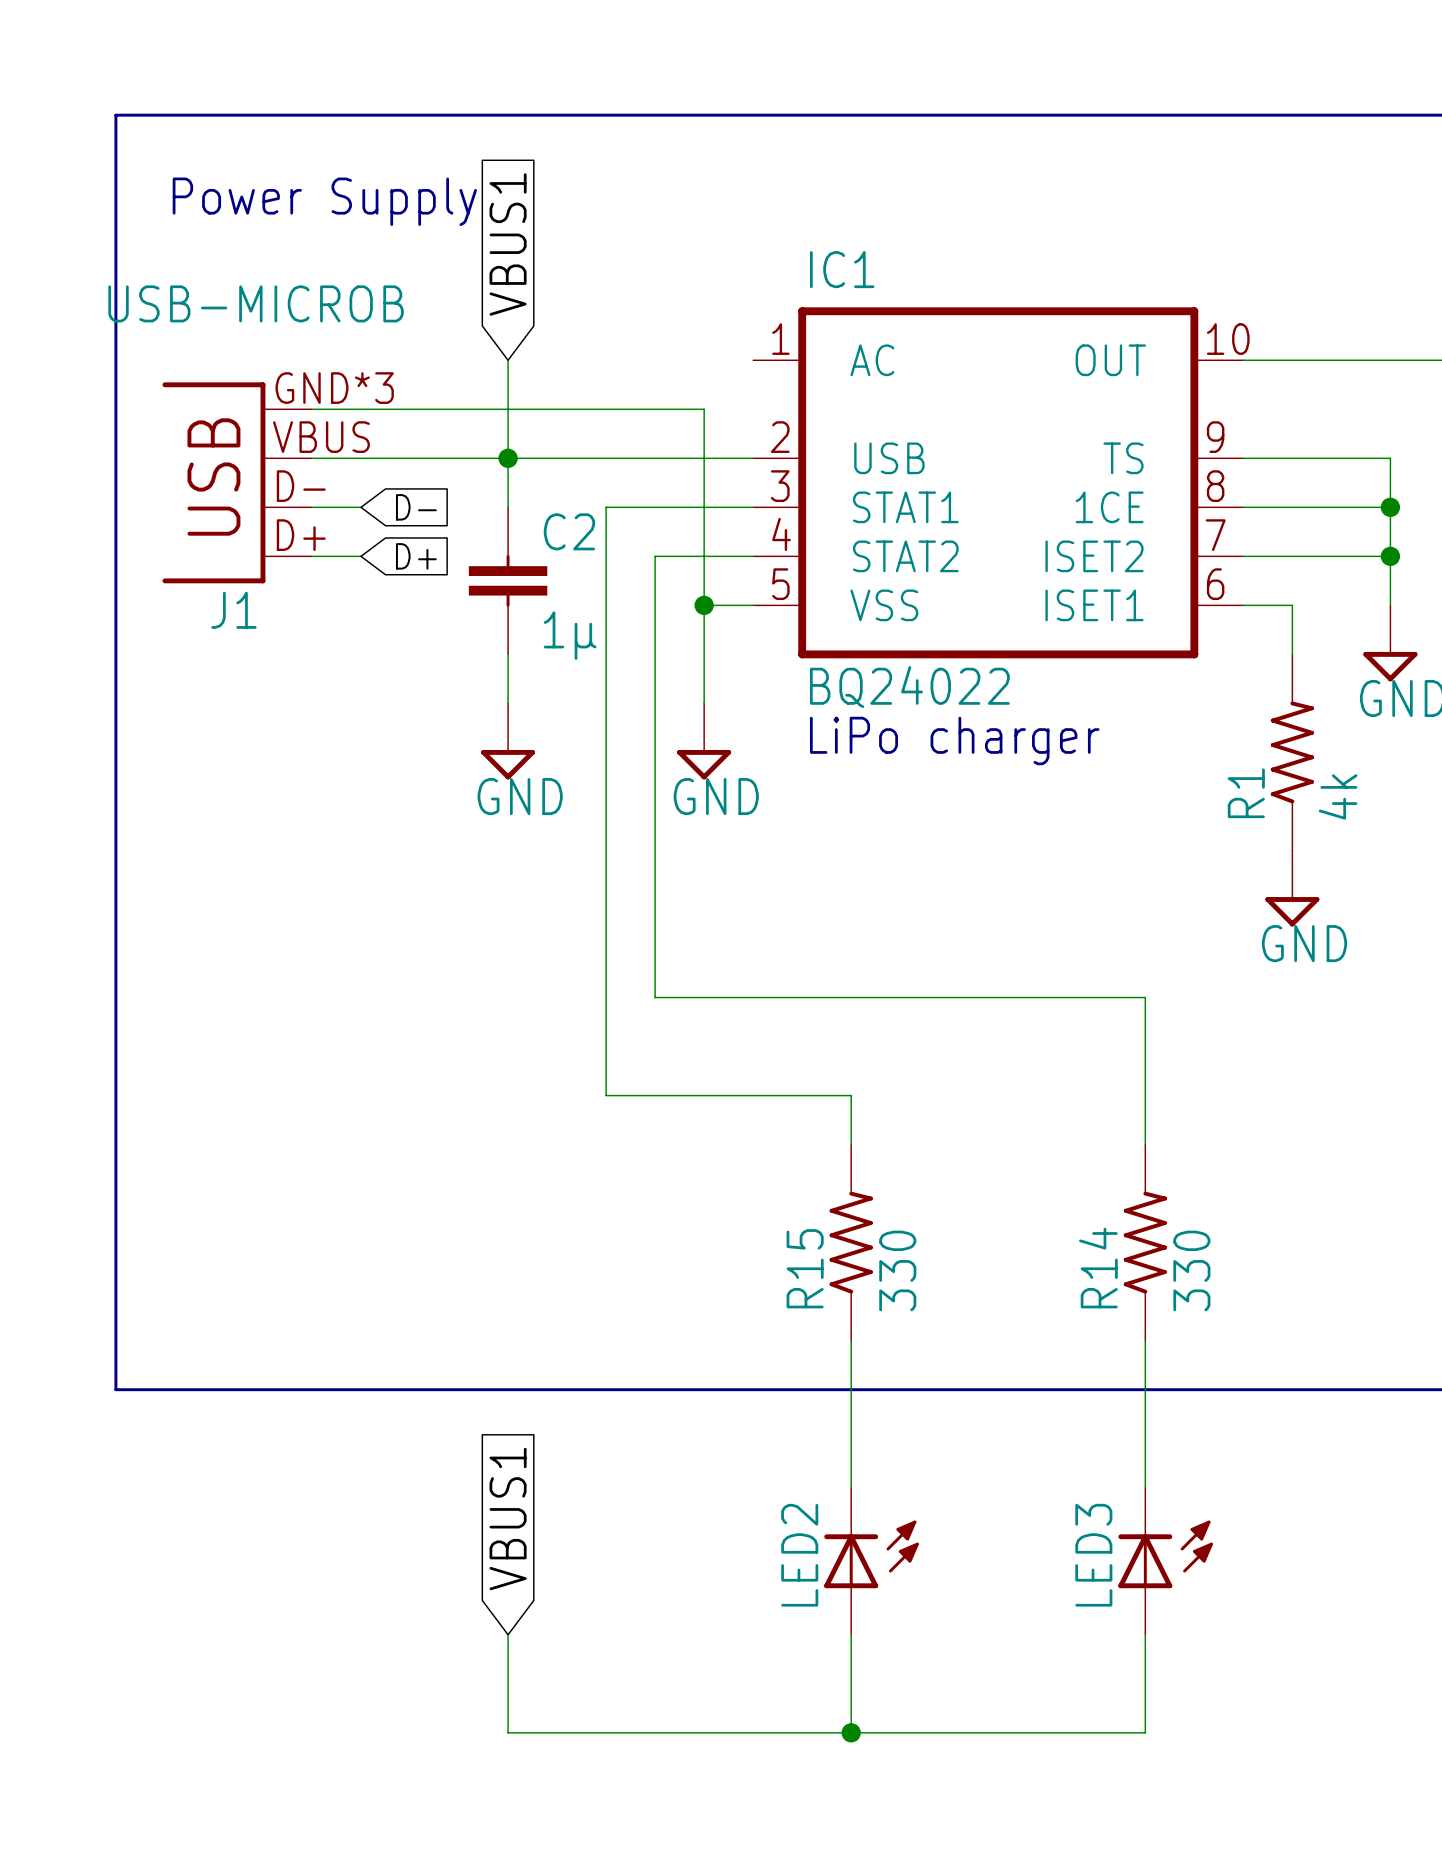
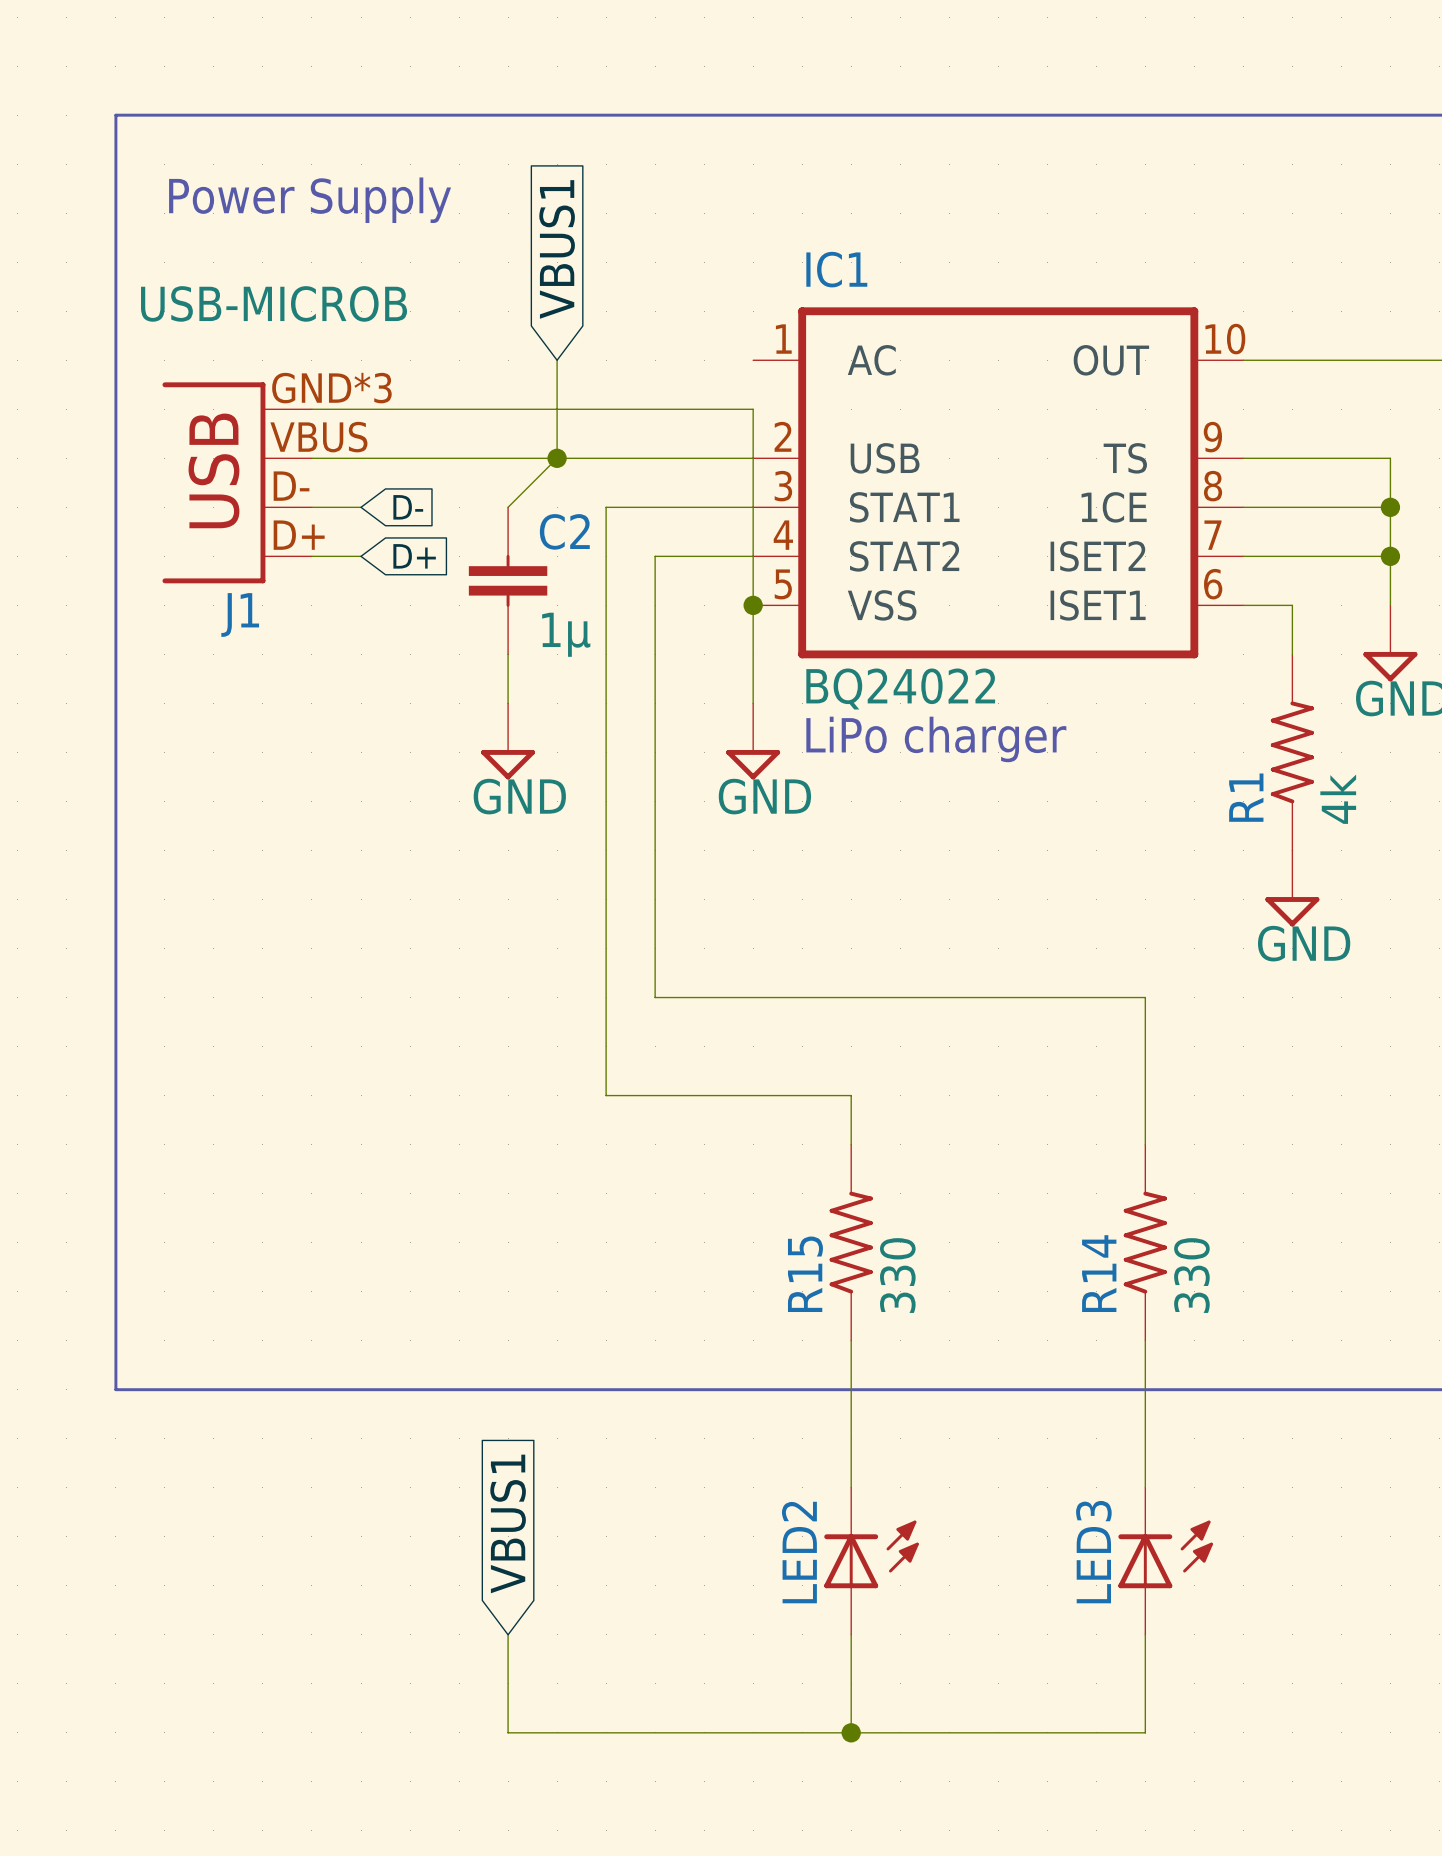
global label position: VBUS1 (508, 244) -> VBUS1 (557, 249)
wire: (508, 360) (508, 507) -> (557, 360) (557, 458) (508, 507)
wire: (704, 409) (704, 703) -> (704, 409) (753, 409) (753, 703)
junction position: (508, 458) -> (557, 458)
wire: (704, 605) (753, 605) -> none
junction position: (704, 605) -> (753, 605)
power symbol position: GND (704, 741) -> GND (753, 741)

